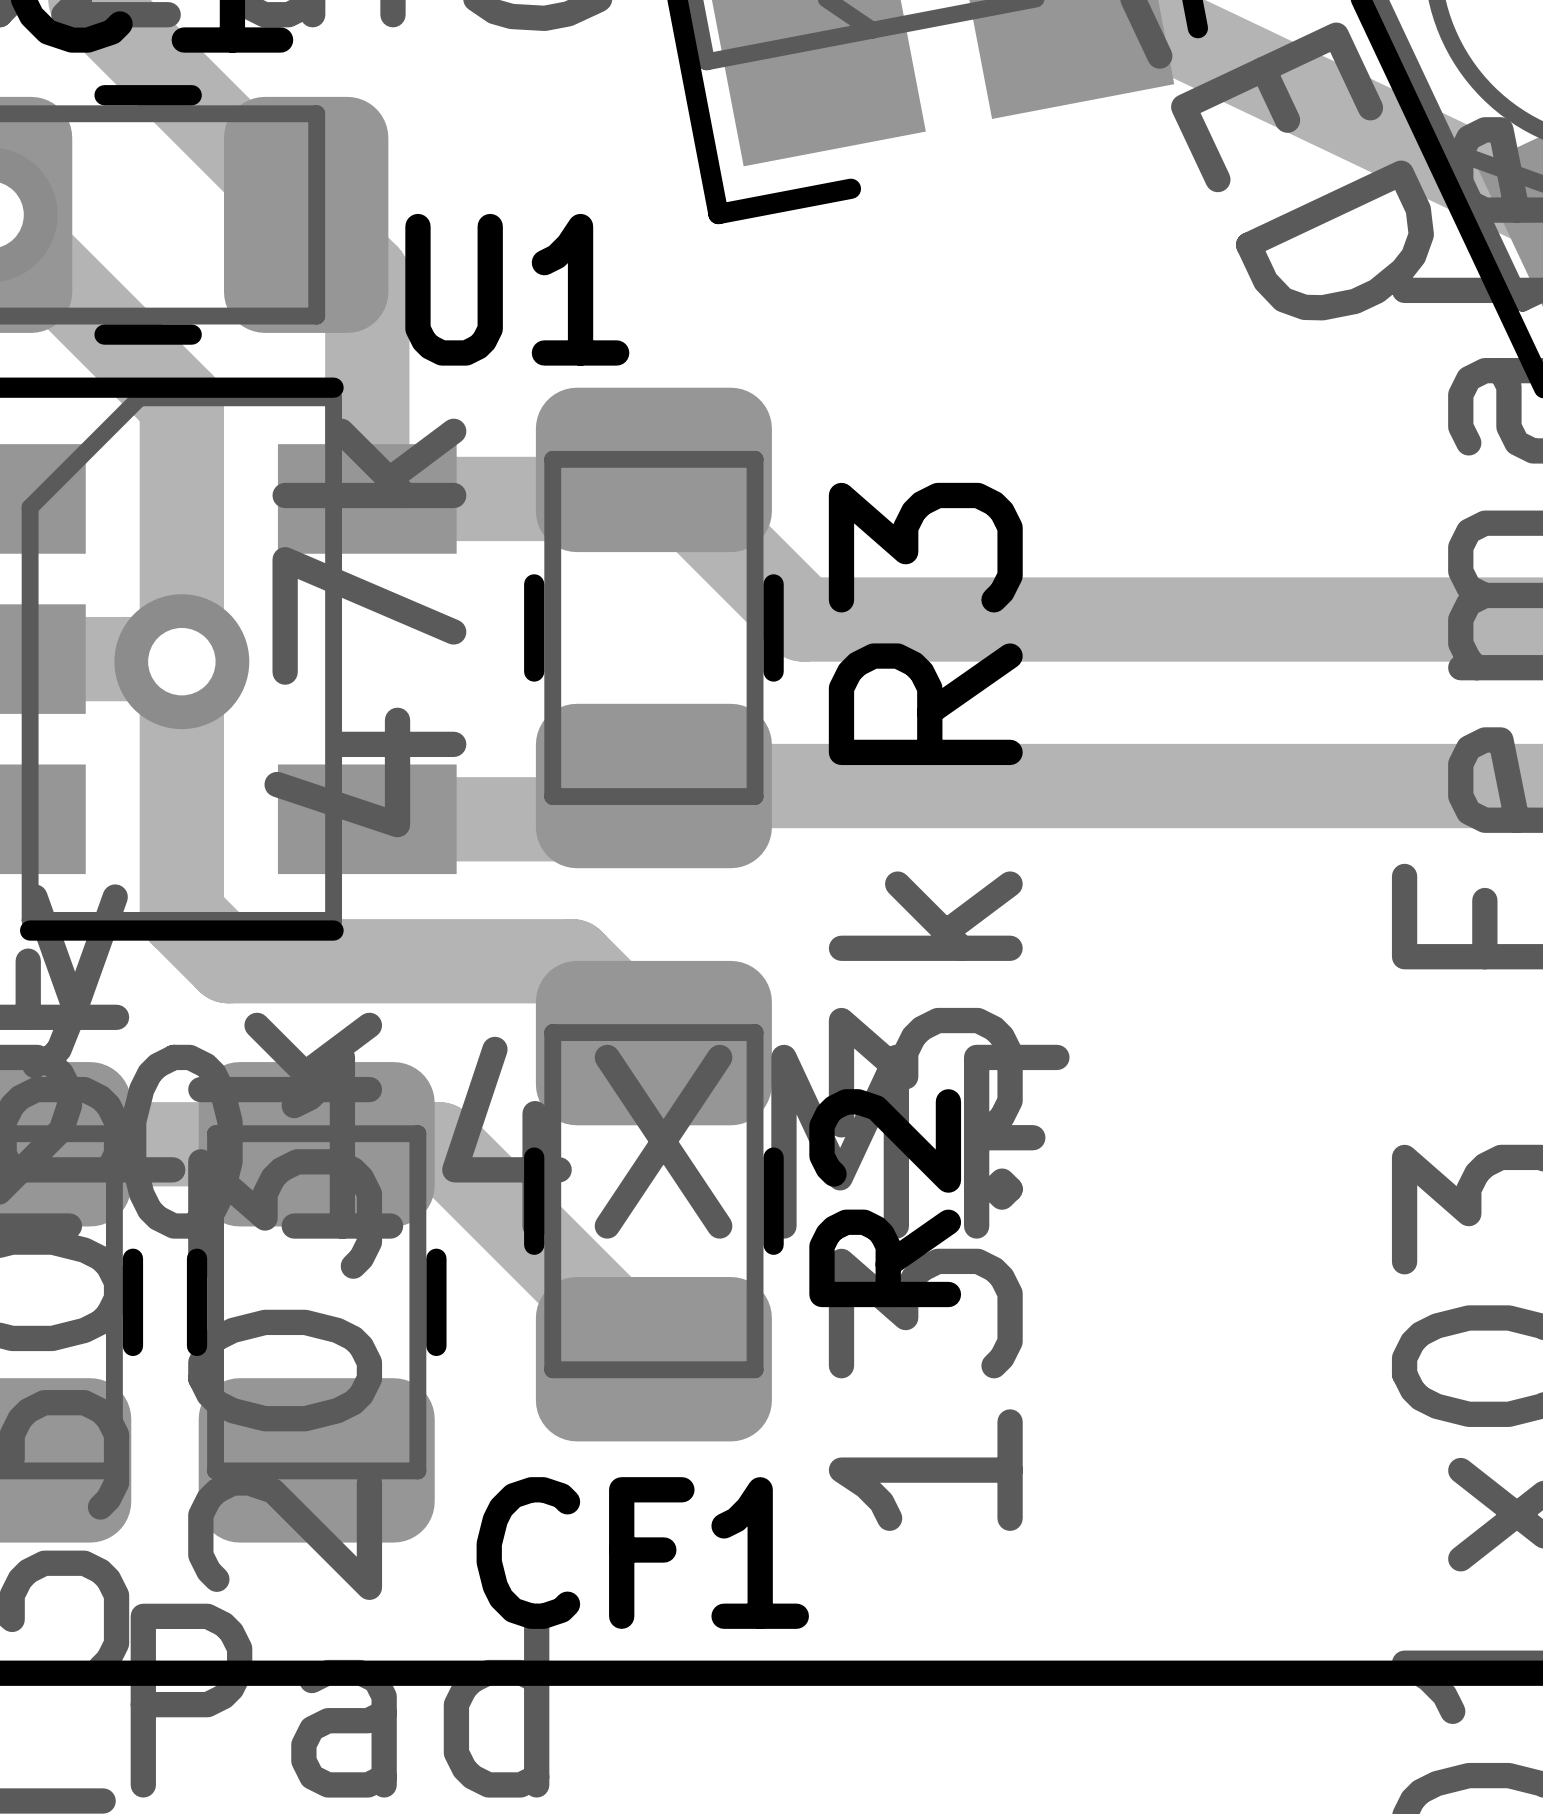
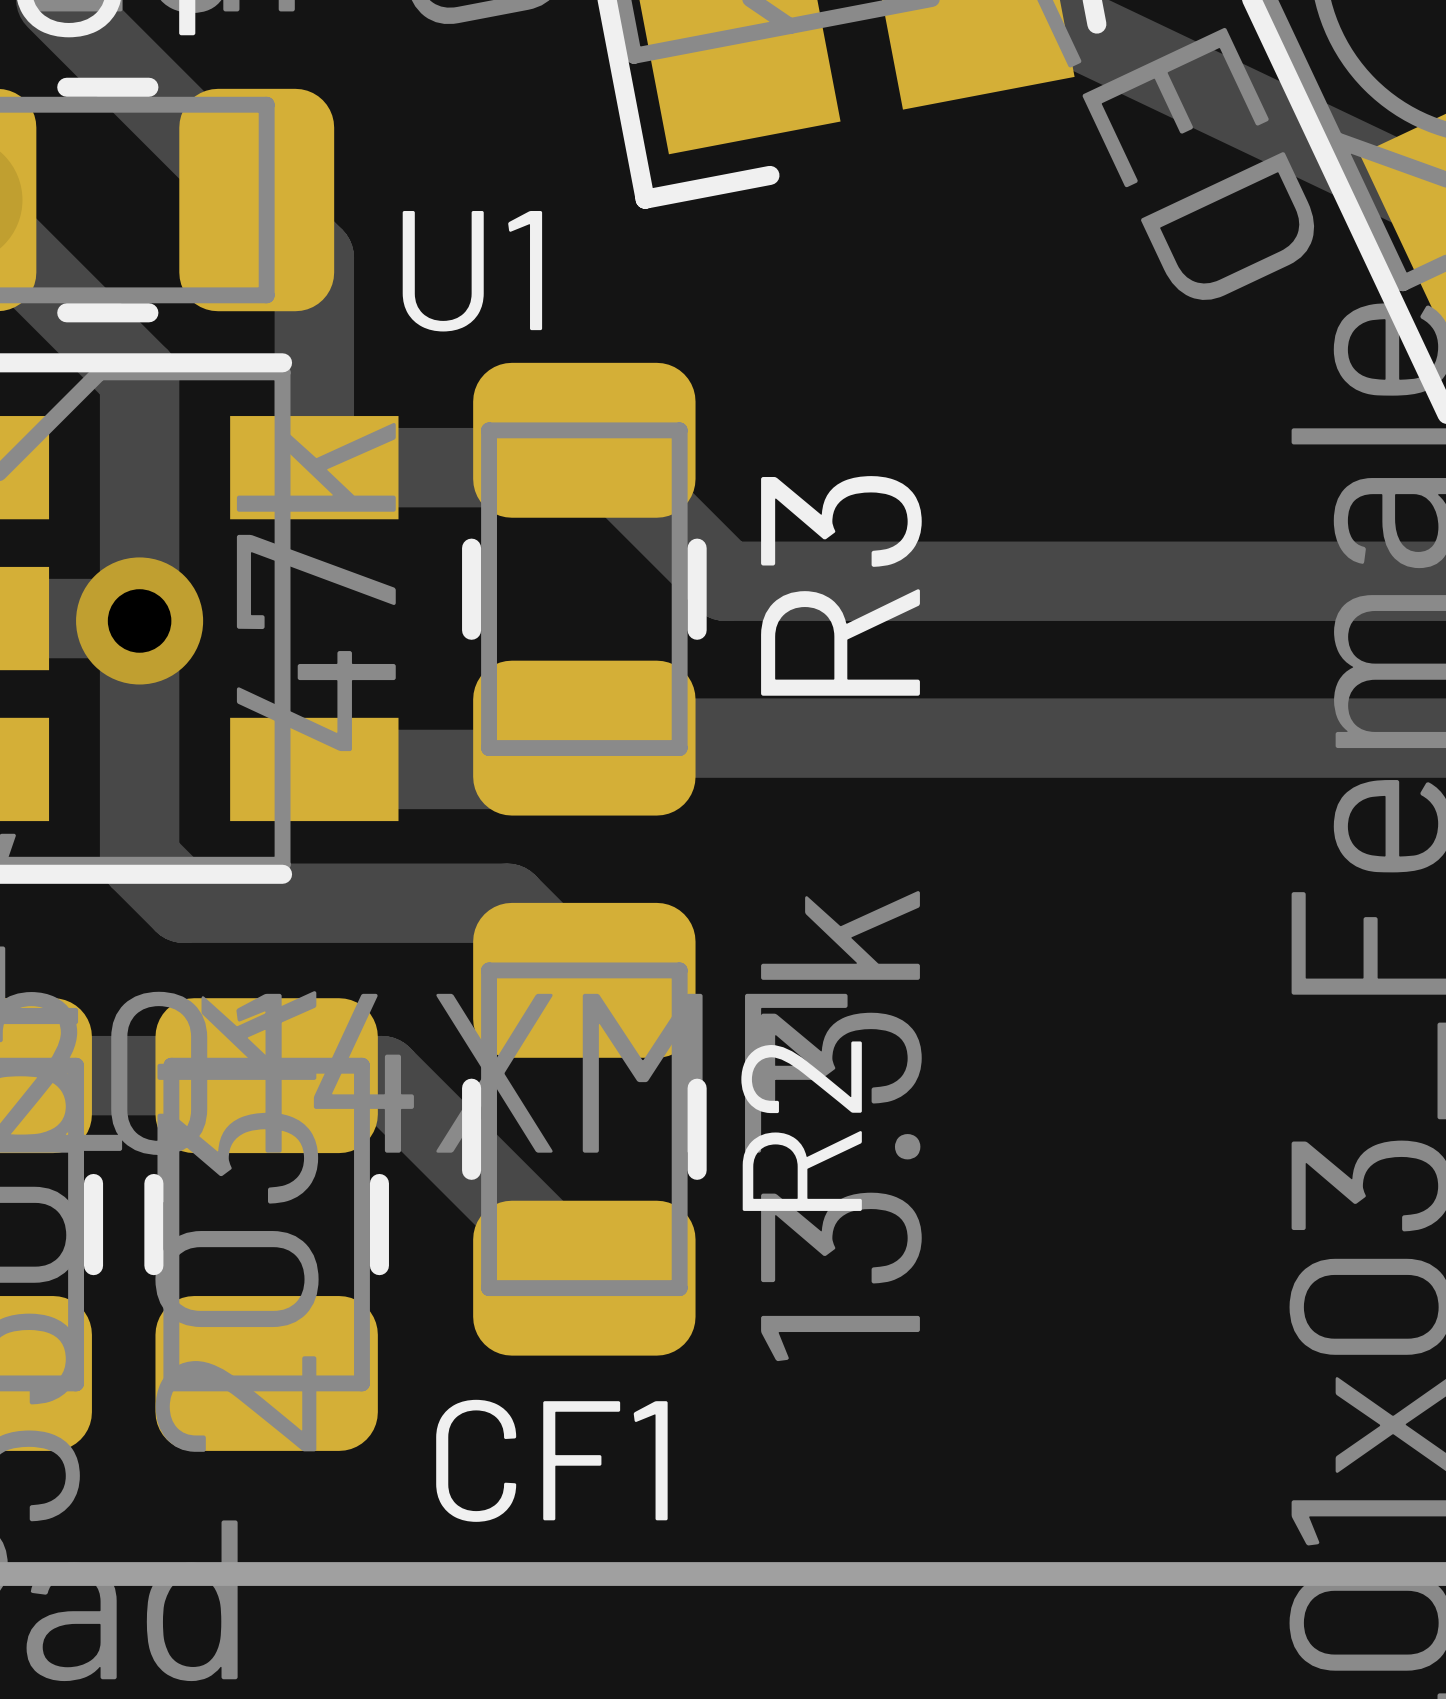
U1 name position: U1 (517, 289) -> U1 (472, 271)
CF1 name position: CF1 (642, 1553) -> CF1 (551, 1460)

